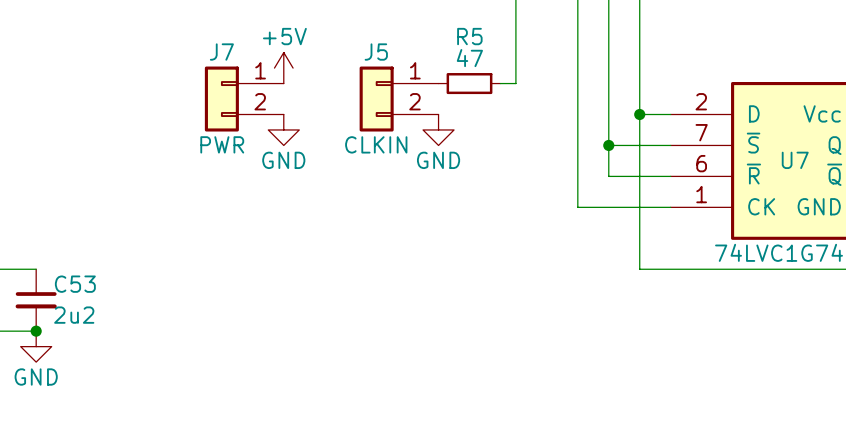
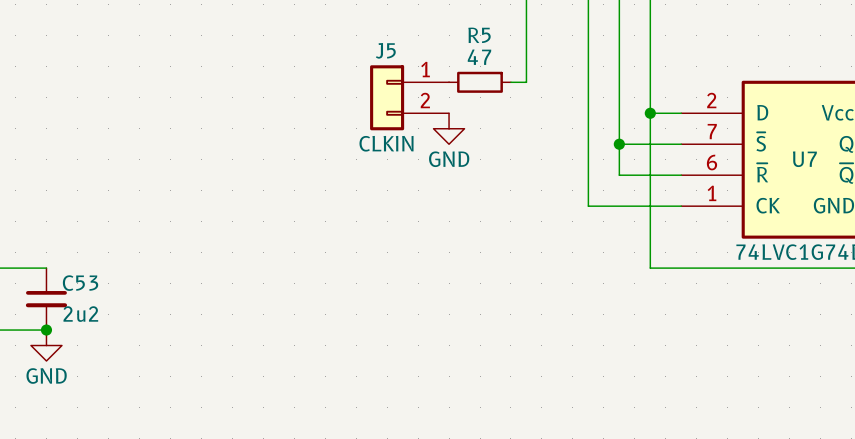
power symbol: +5V (283, 68) -> none
J7: PWR (244, 99) -> none
power symbol: GND (283, 129) -> none

